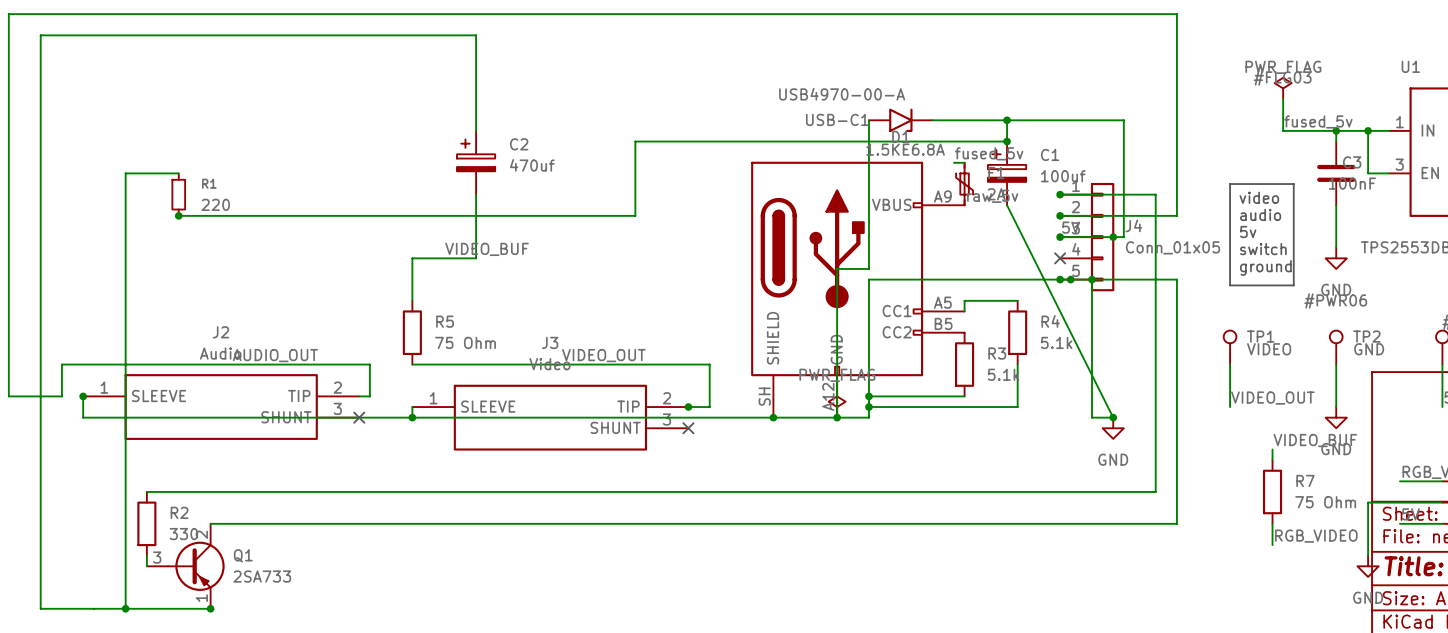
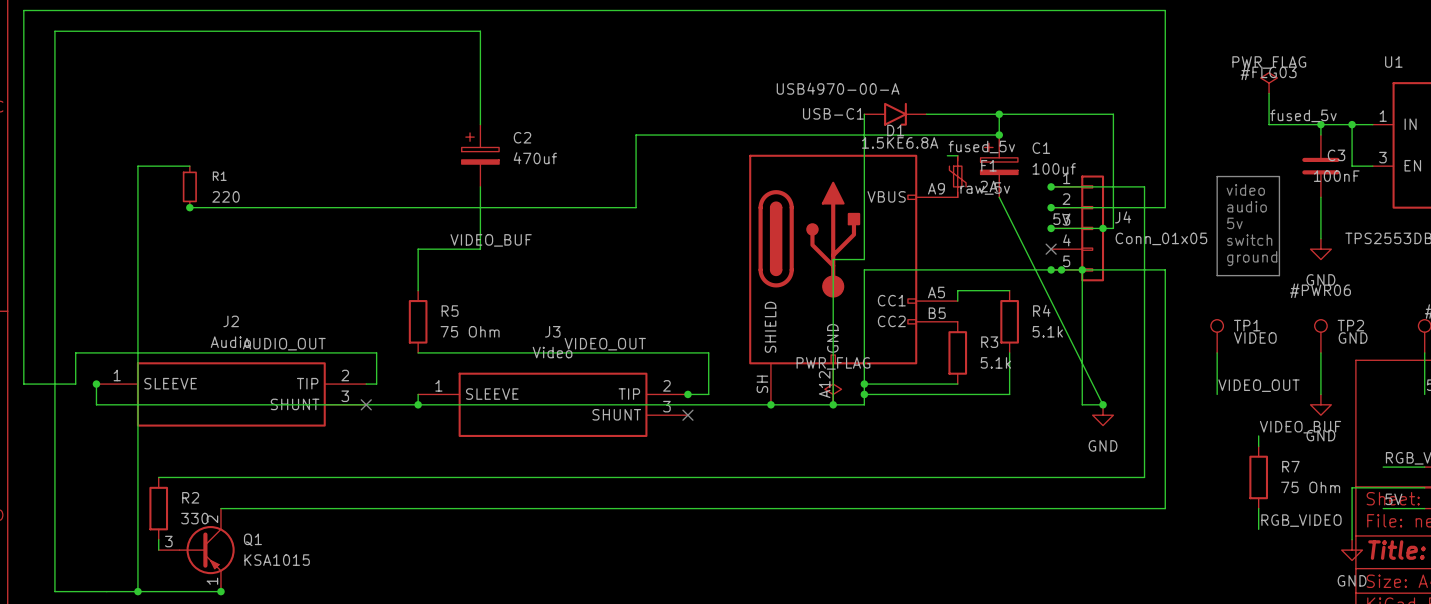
Q1 value: 2SA733 (262, 576) -> KSA1015 (277, 560)

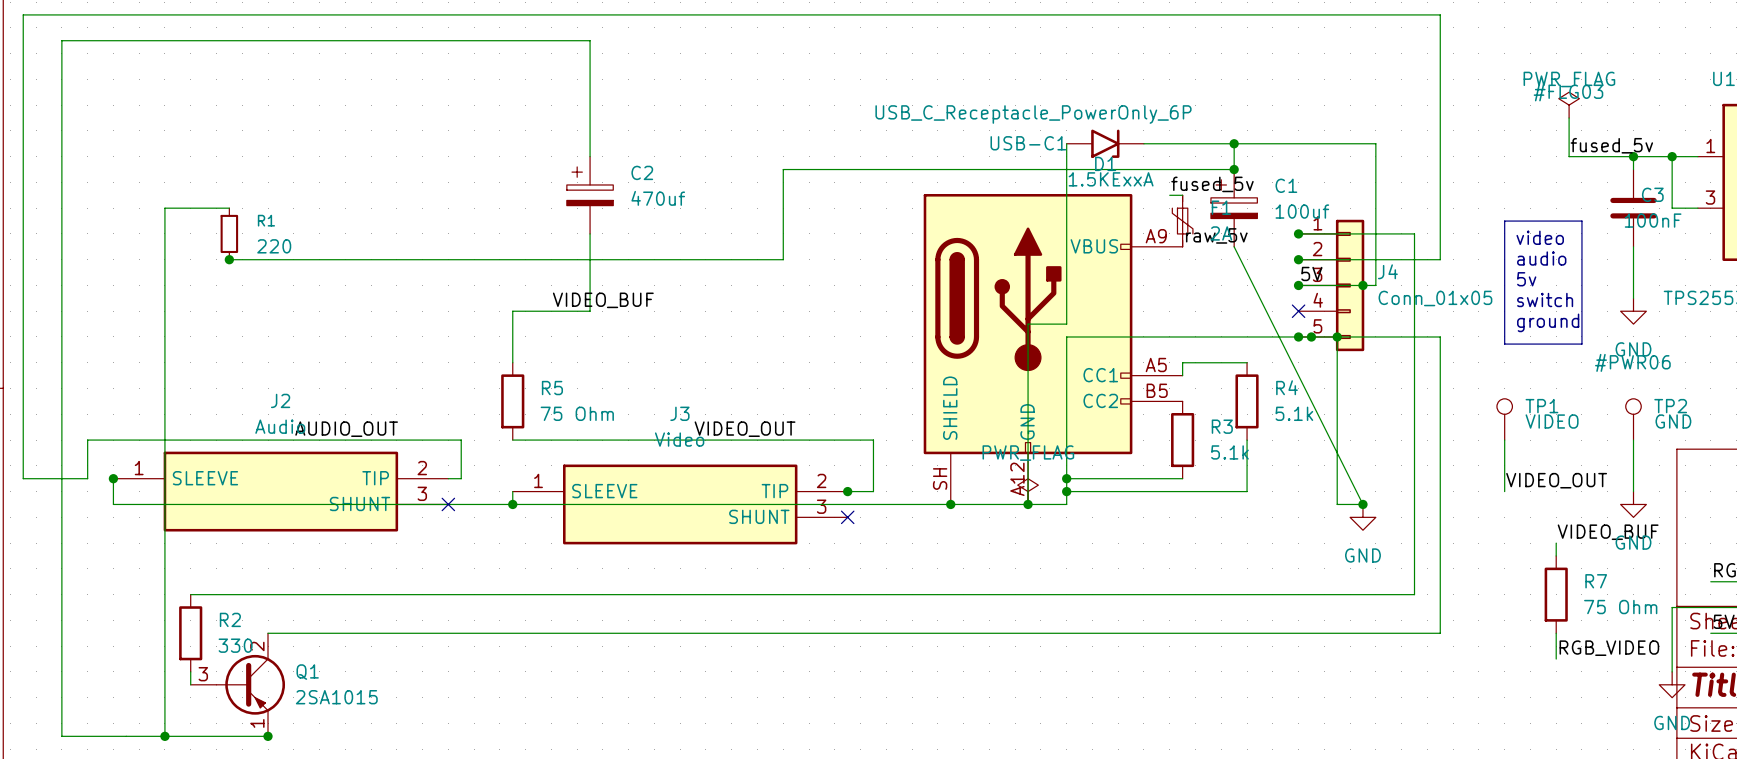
USB-C1 value: USB4970-00-A (838, 88) -> USB_C_Receptacle_PowerOnly_6P (1033, 114)
D1 value: 1.5KE6.8A (900, 142) -> 1.5KExxA (1111, 179)
Q1 value: KSA1015 (277, 560) -> 2SA1015 (336, 697)

